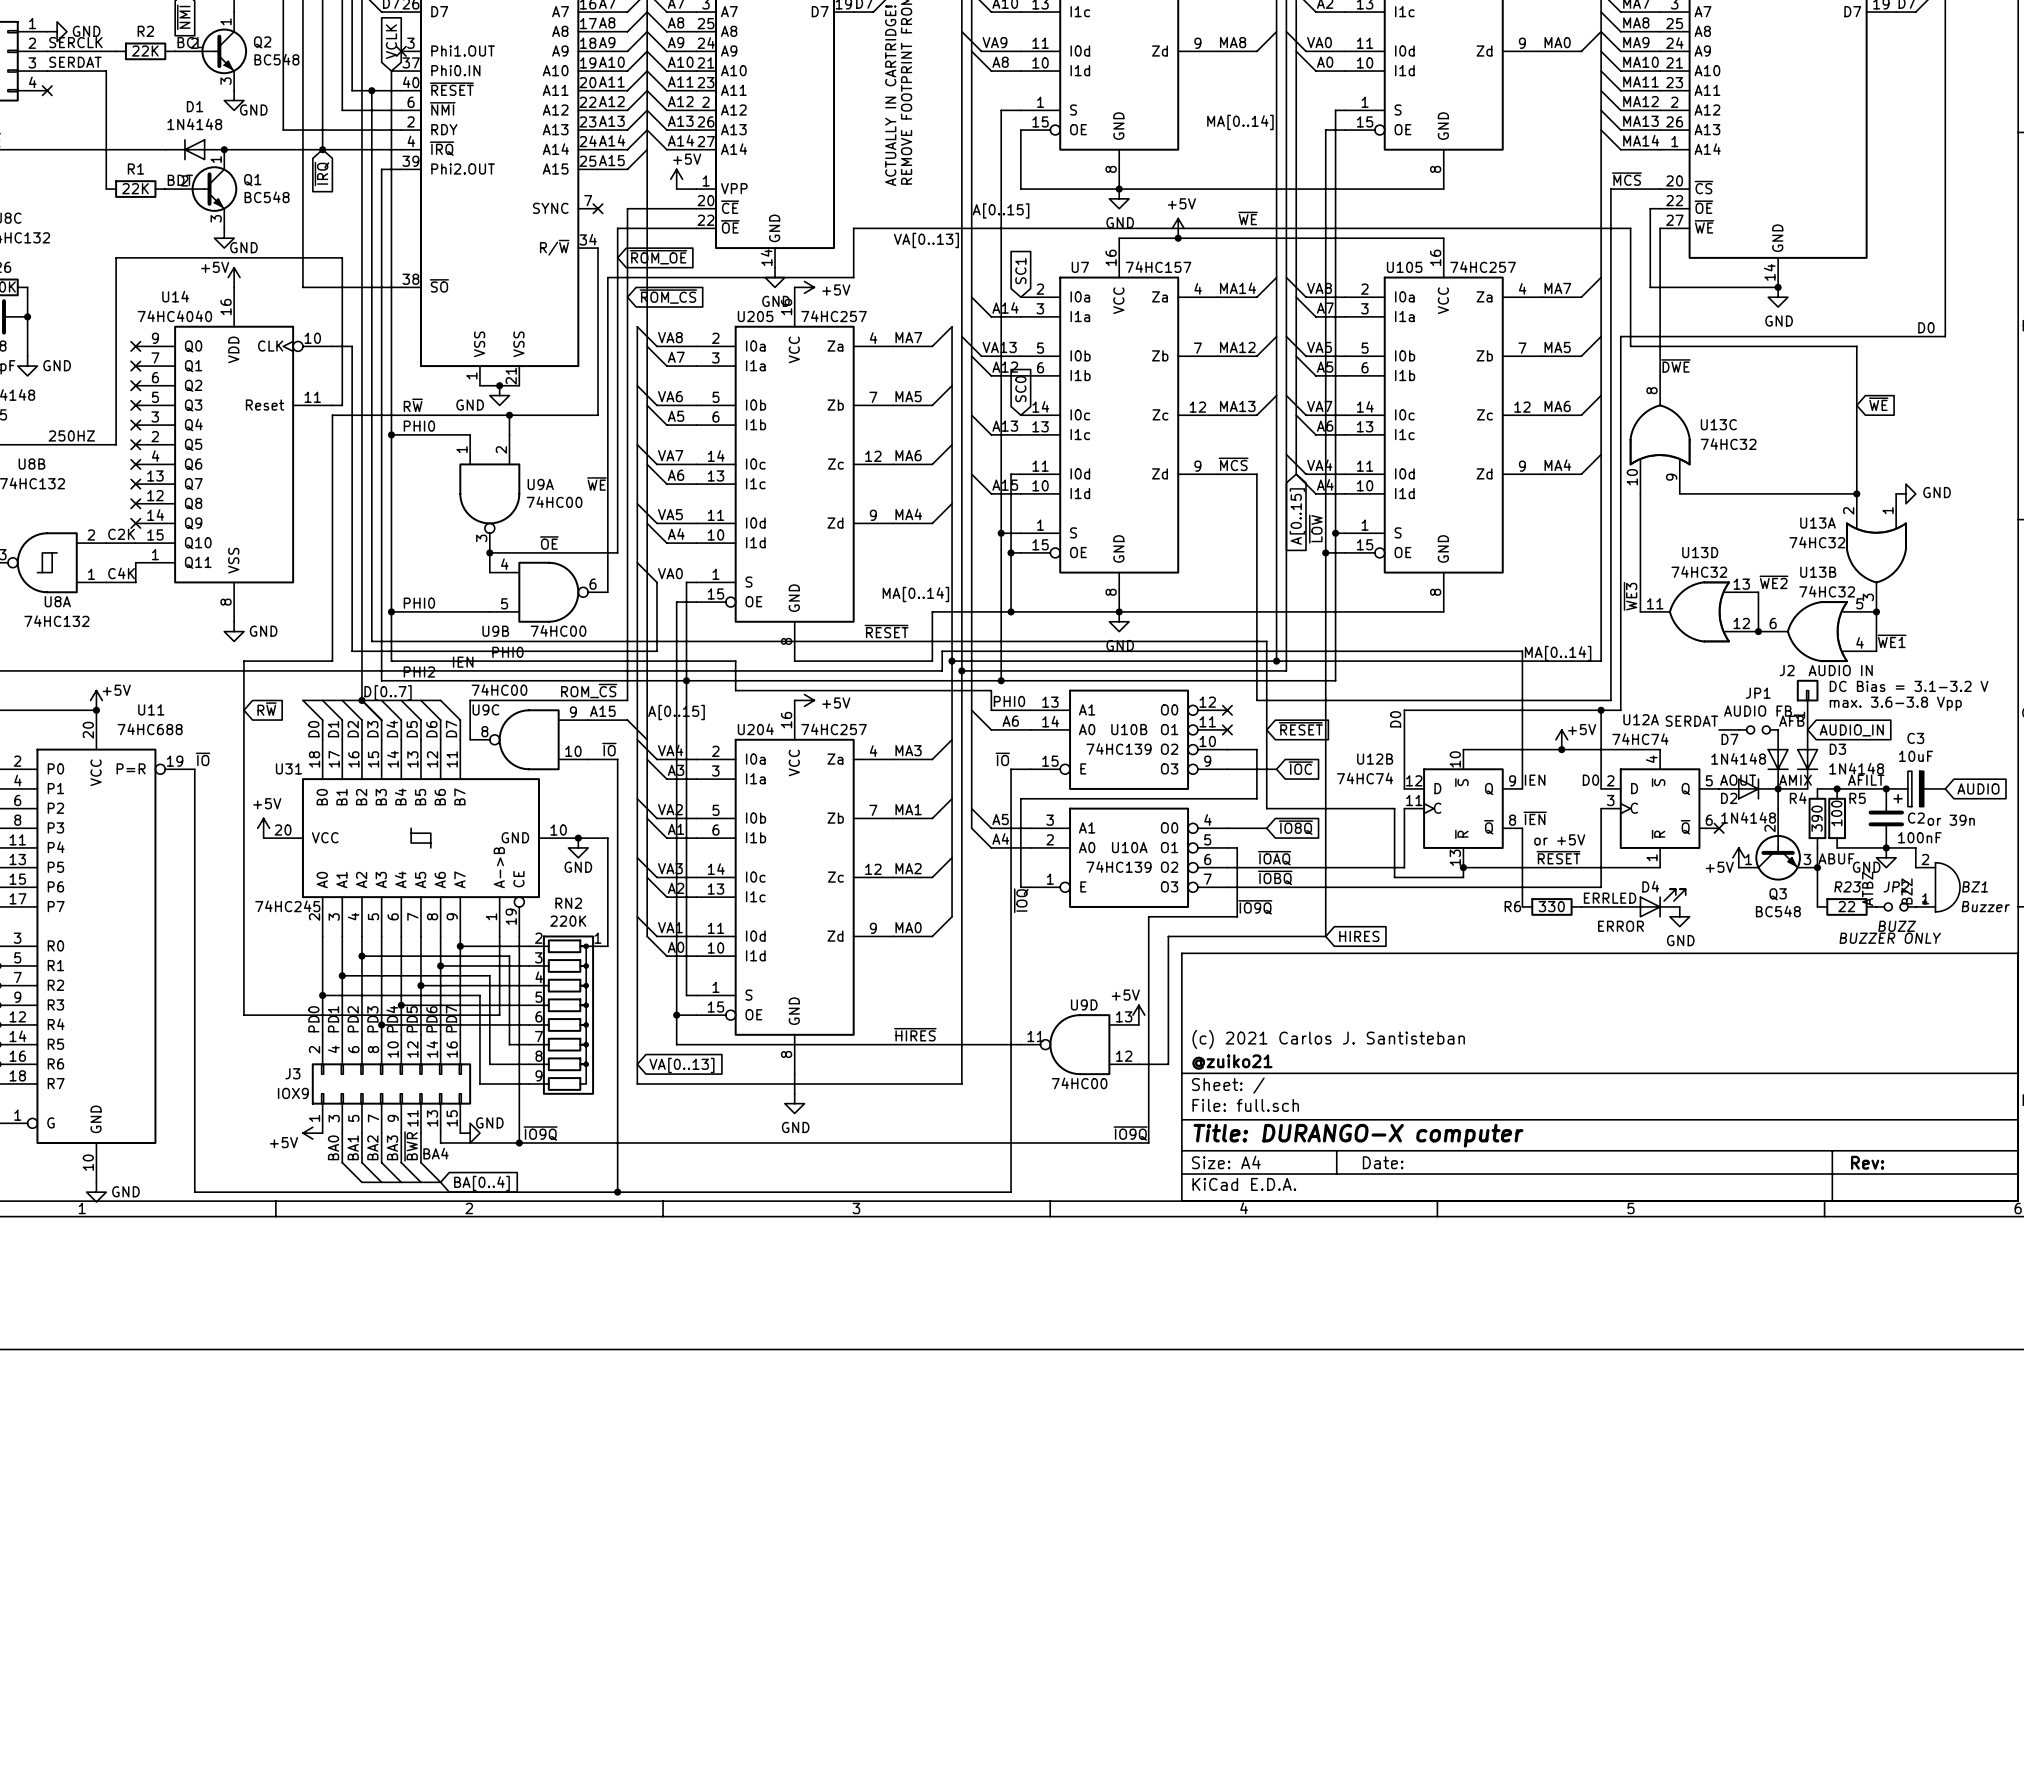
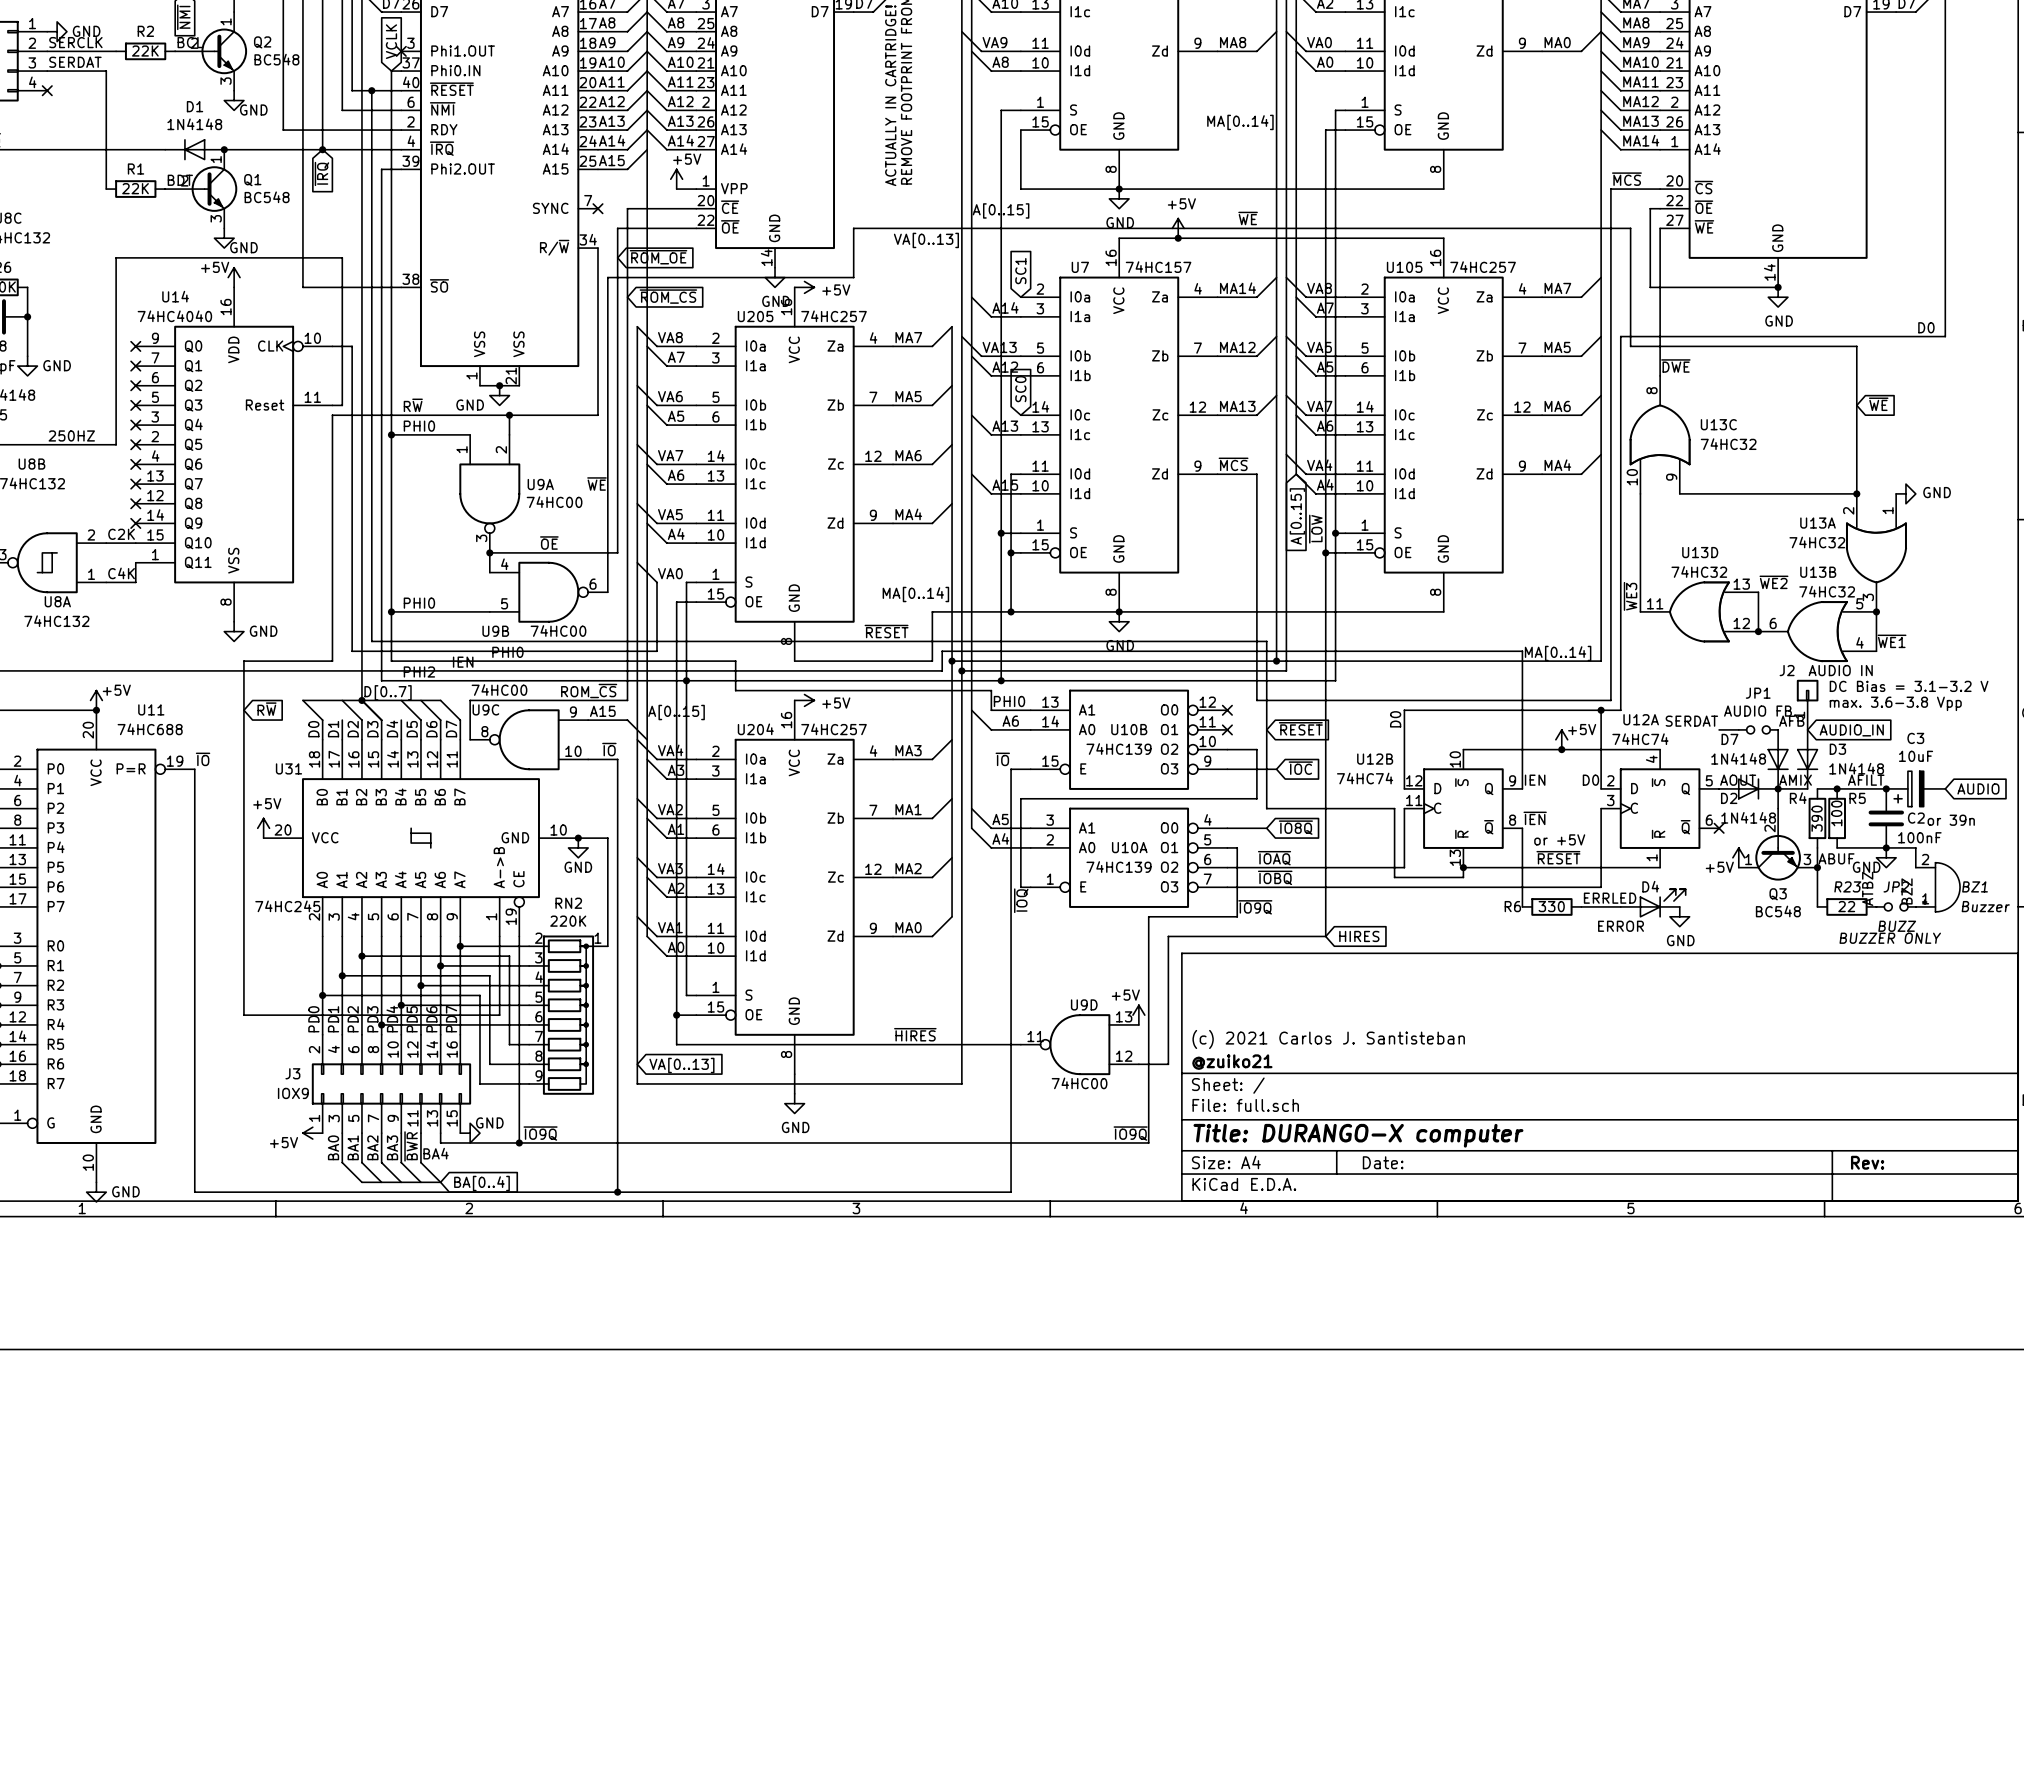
wire: (322, 700) (342, 720) -> none
wire: (381, 700) (401, 720) -> none

